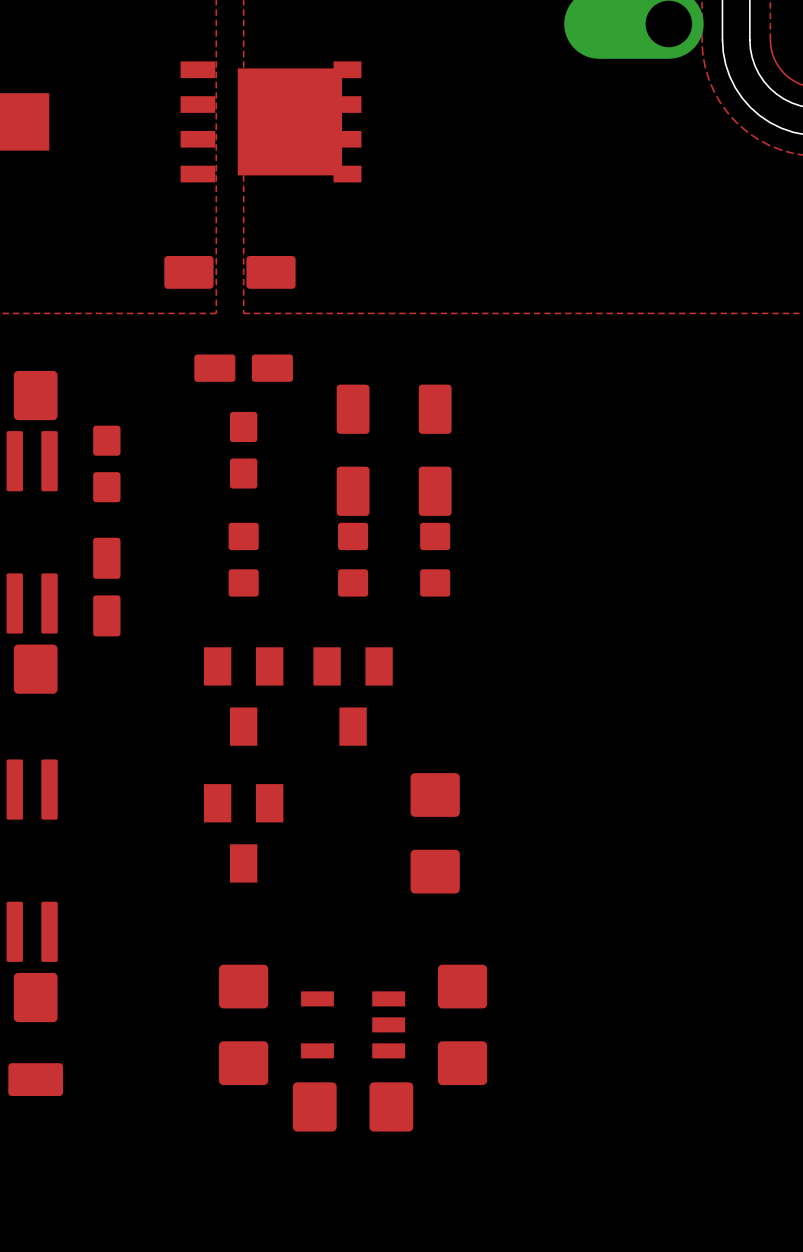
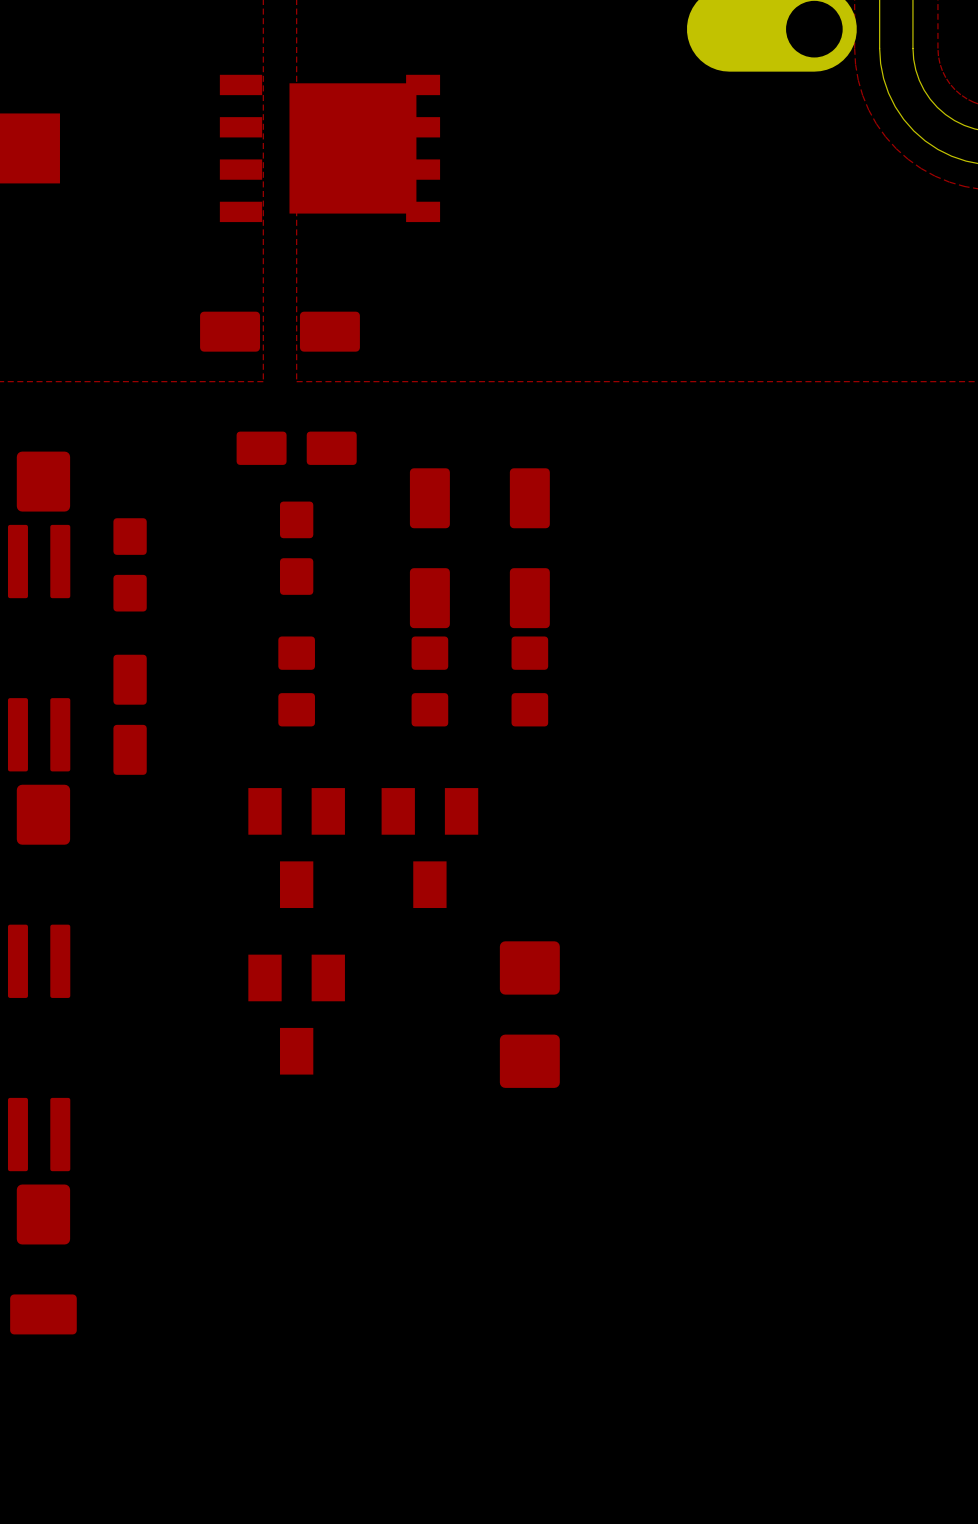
part: (243, 1024) -> none
part: (353, 1024) -> none
part: (462, 1024) -> none
part: (353, 1106) -> none

